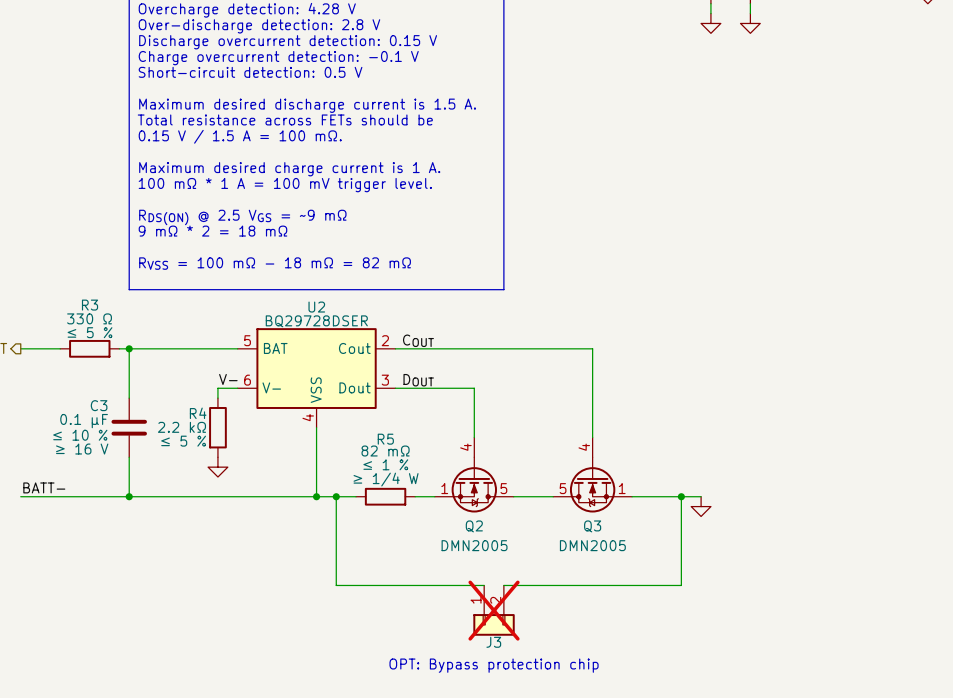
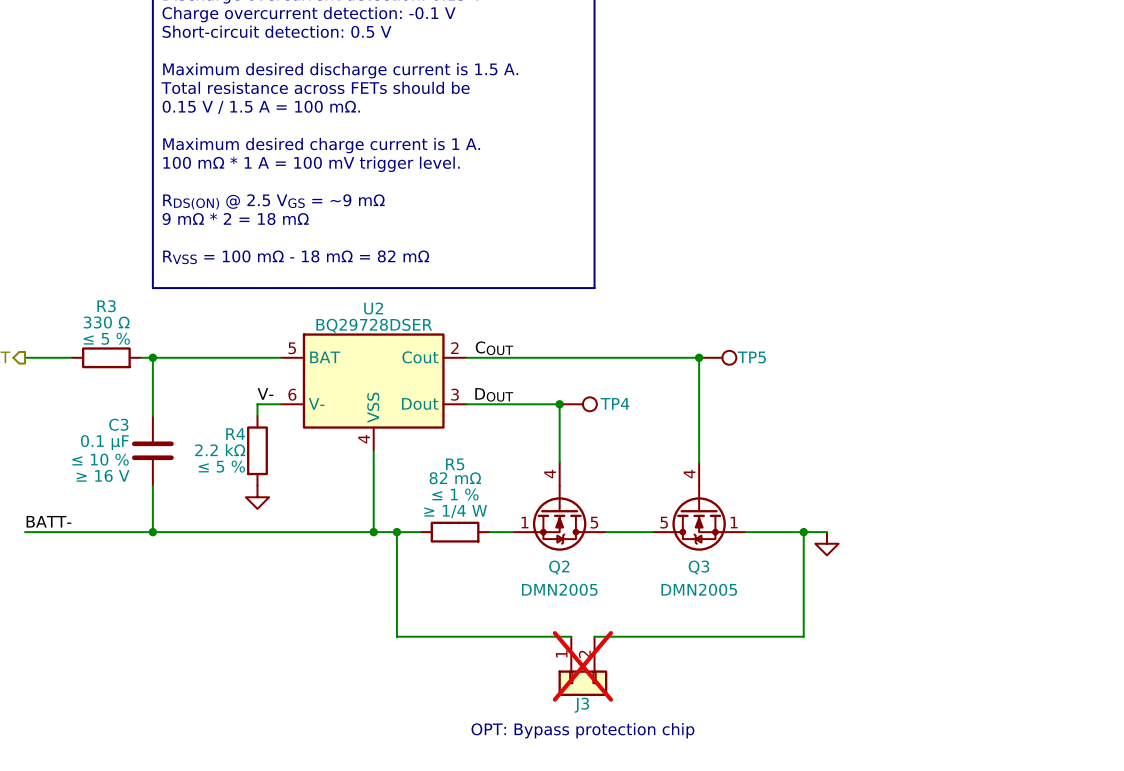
junction: none -> (699, 357)
TP5: none -> (717, 357)
junction: none -> (559, 404)
TP4: none -> (578, 404)

